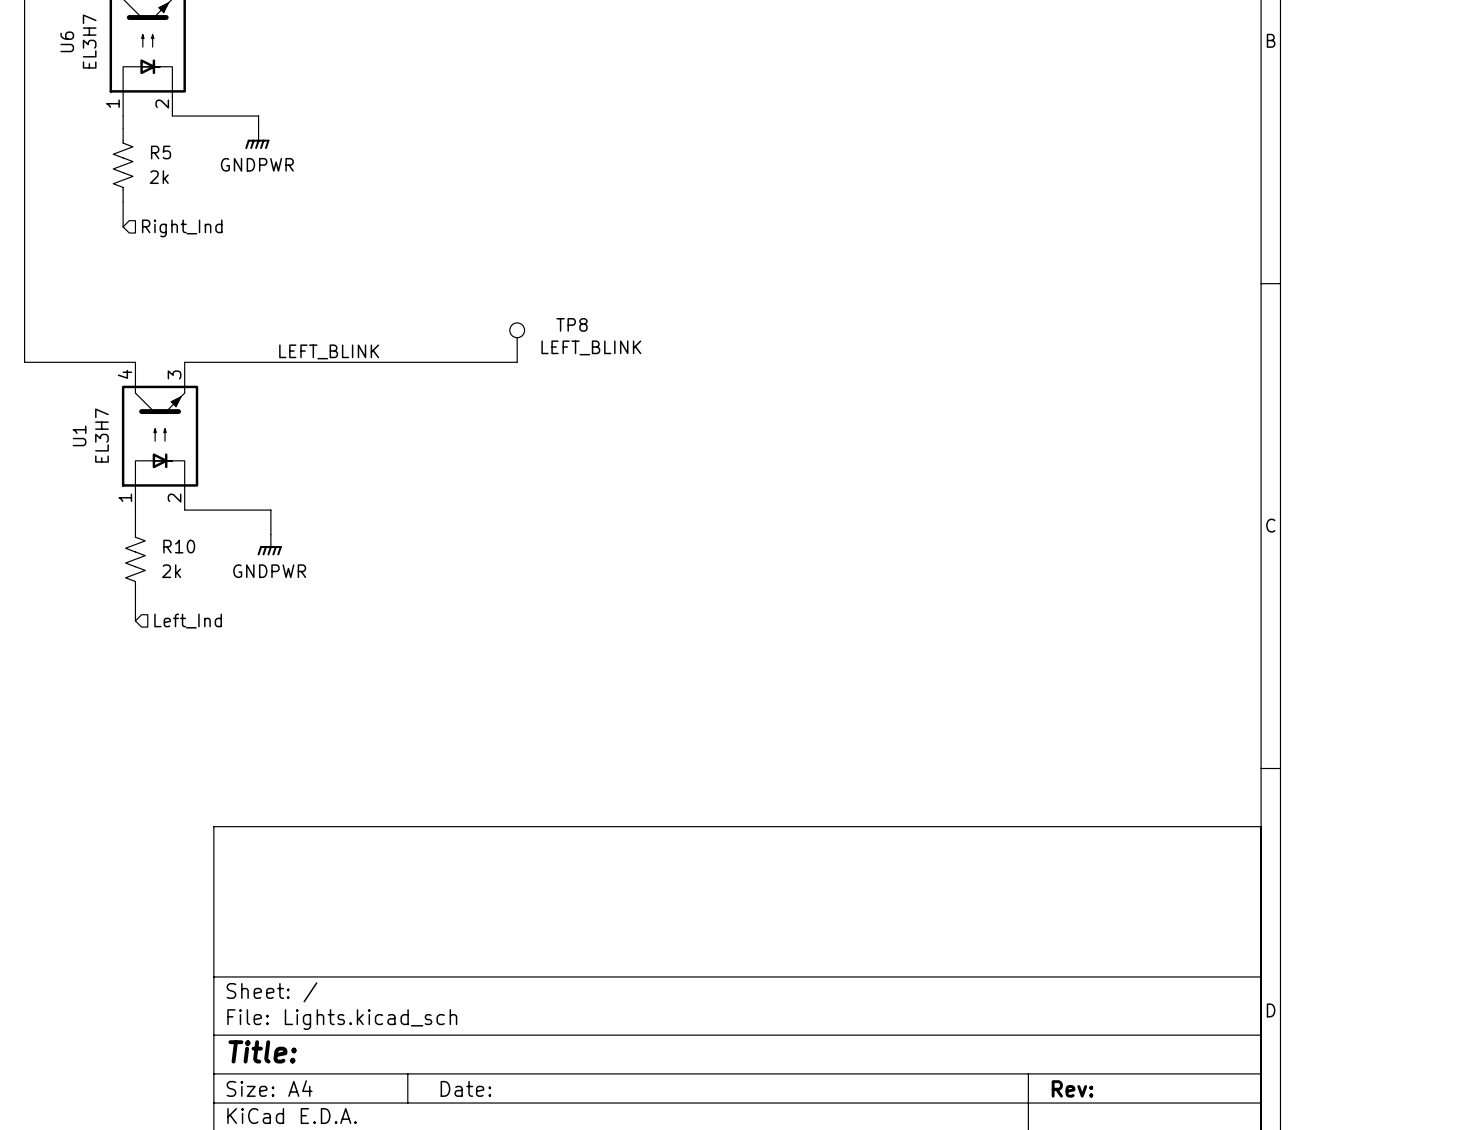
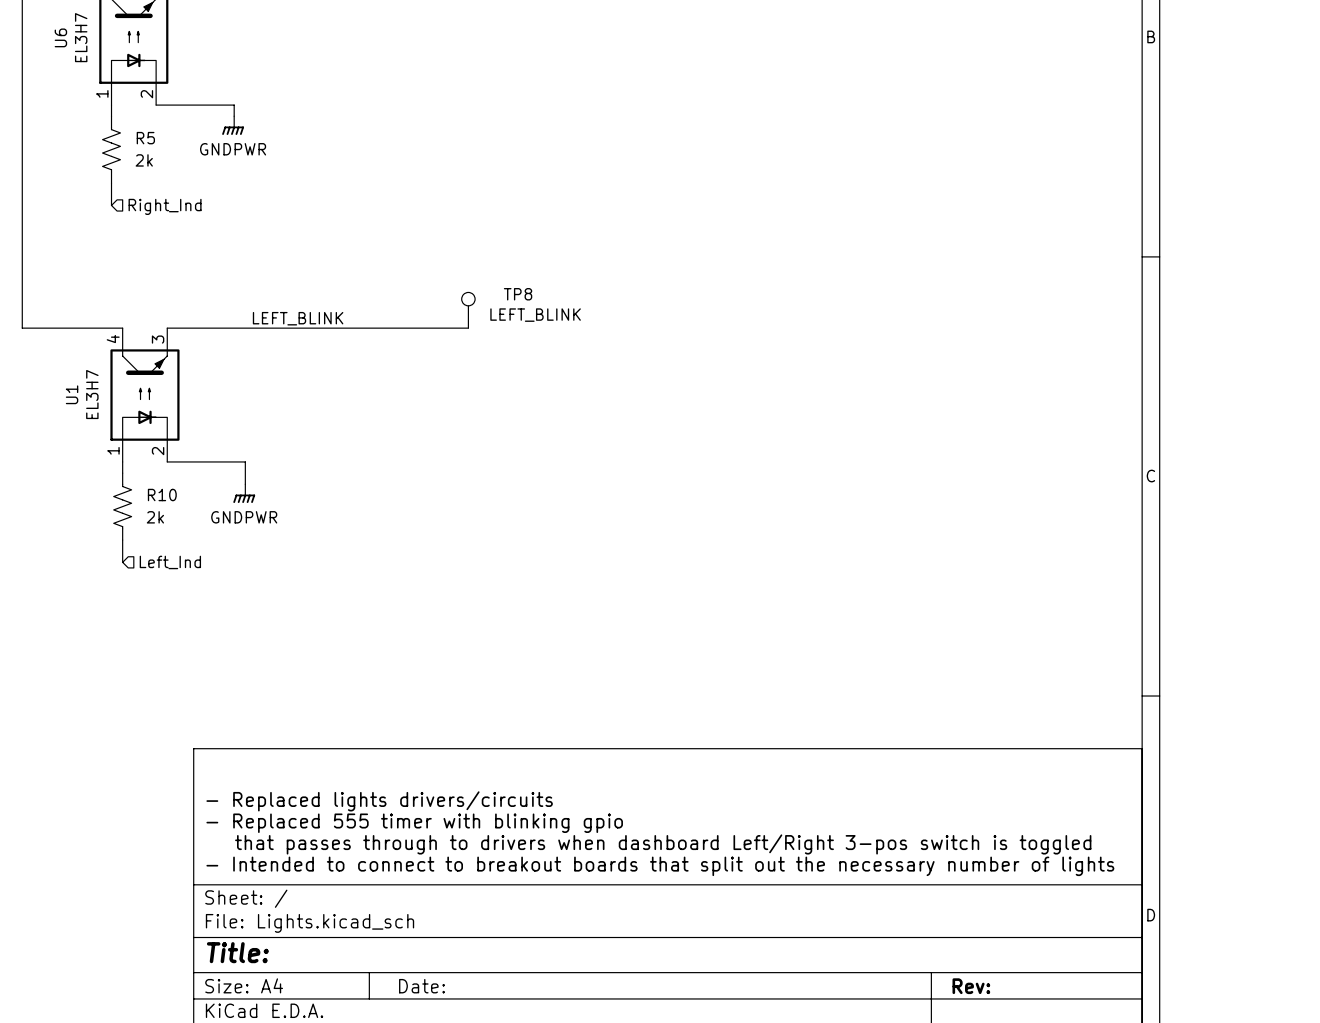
text: none -> - Replaced lights drivers/circuits (379, 801)
text: none -> - Replaced 555 timer with blinking gpio (414, 823)
text: none -> that passes through to drivers when dashboard Left/Right 3-pos switch is toggled (663, 844)
text: none -> - Intended to connect to breakout boards that split out the necessary number of lights (660, 866)

